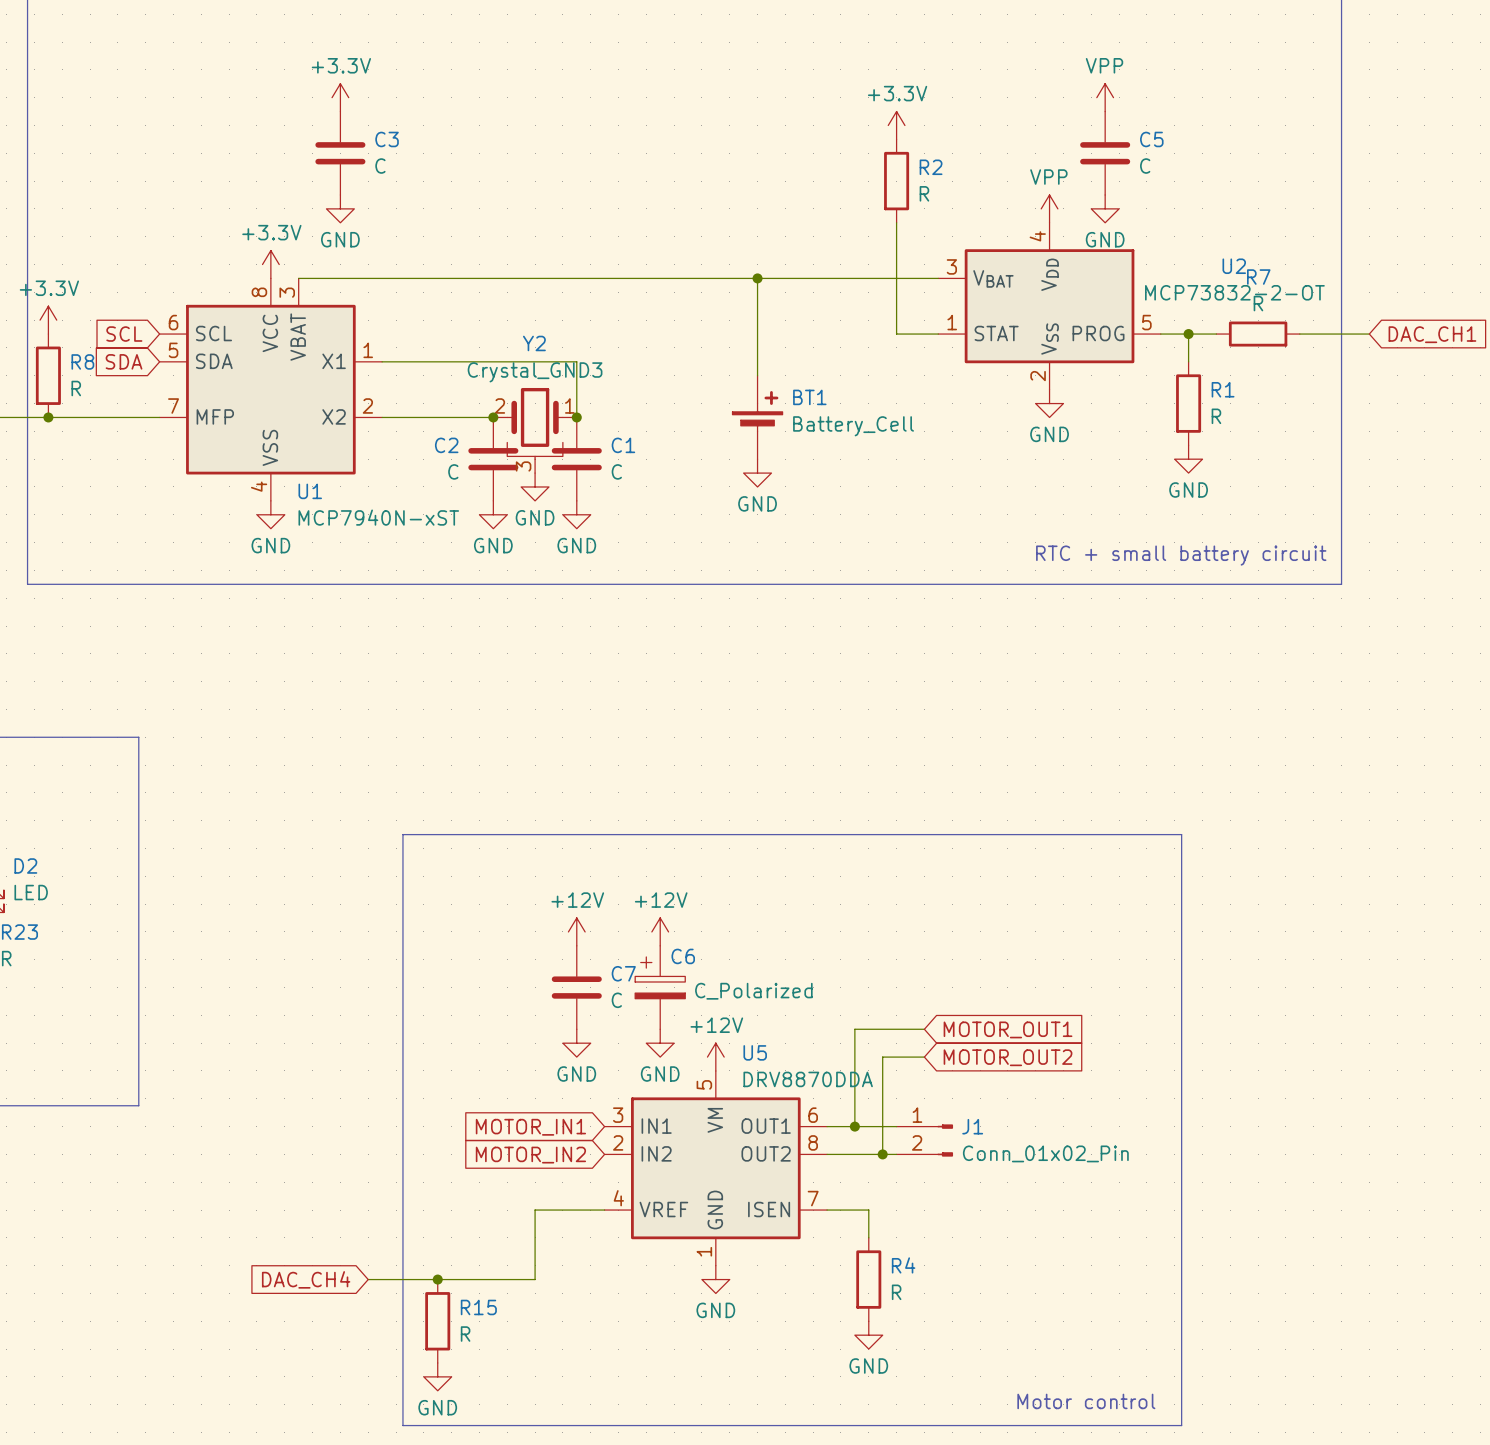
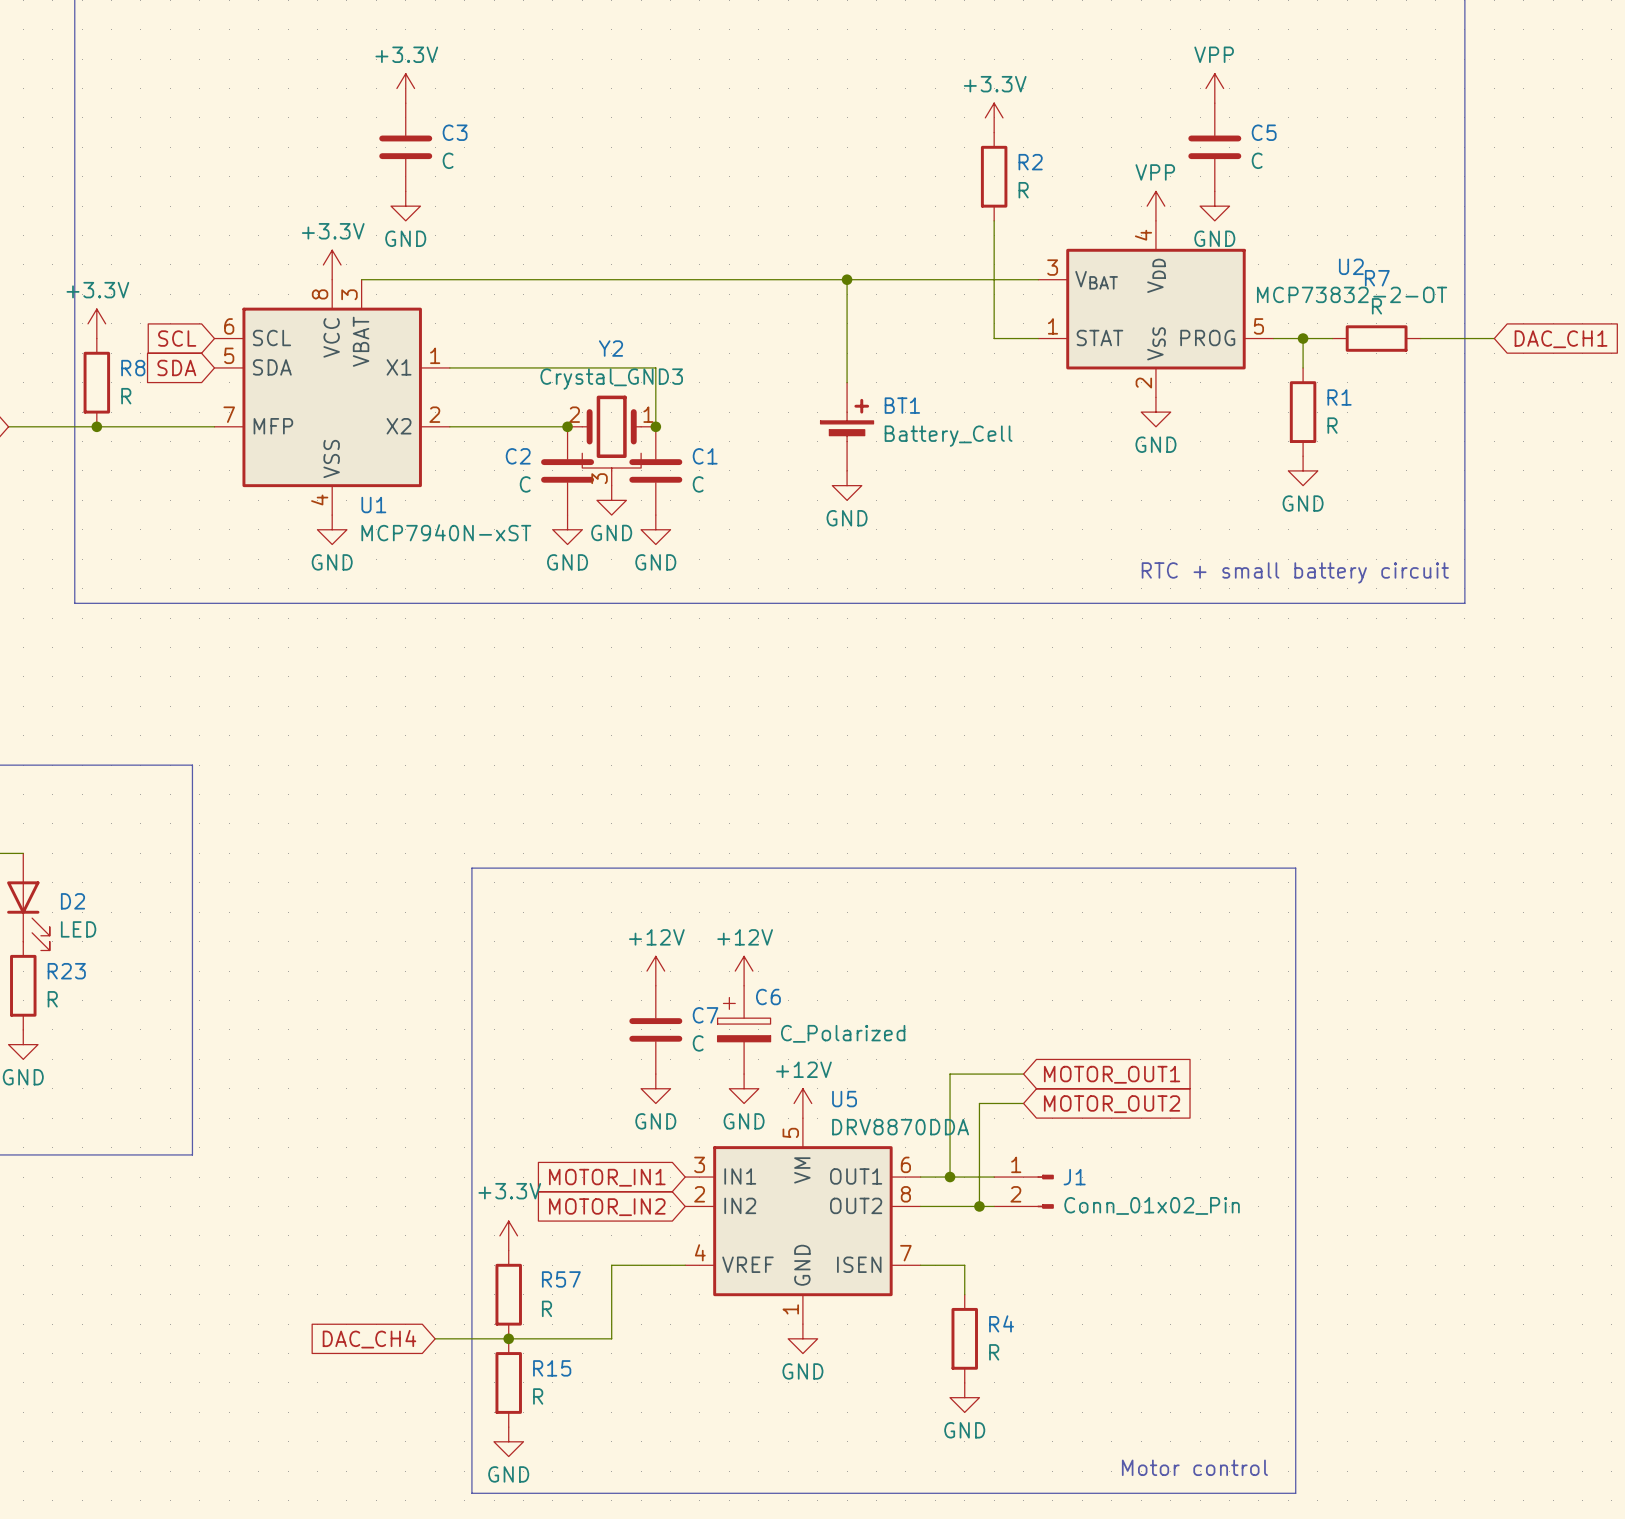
power symbol: none -> +3.3V (508, 1235)
R57: none -> R (508, 1294)

